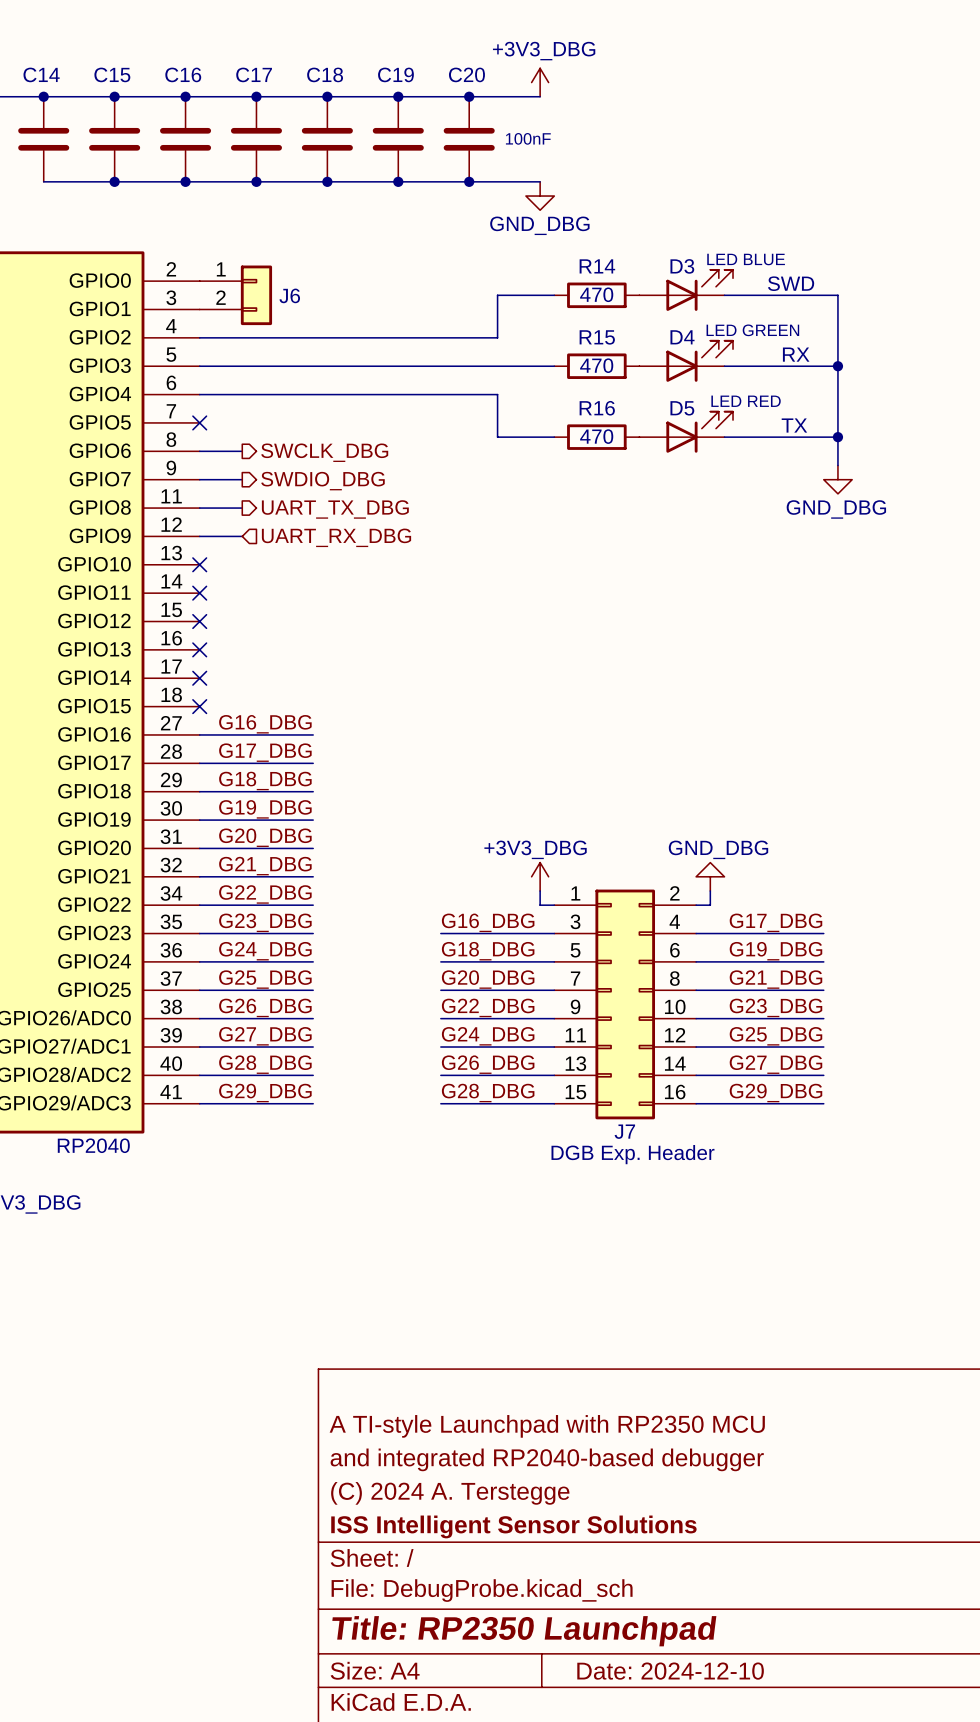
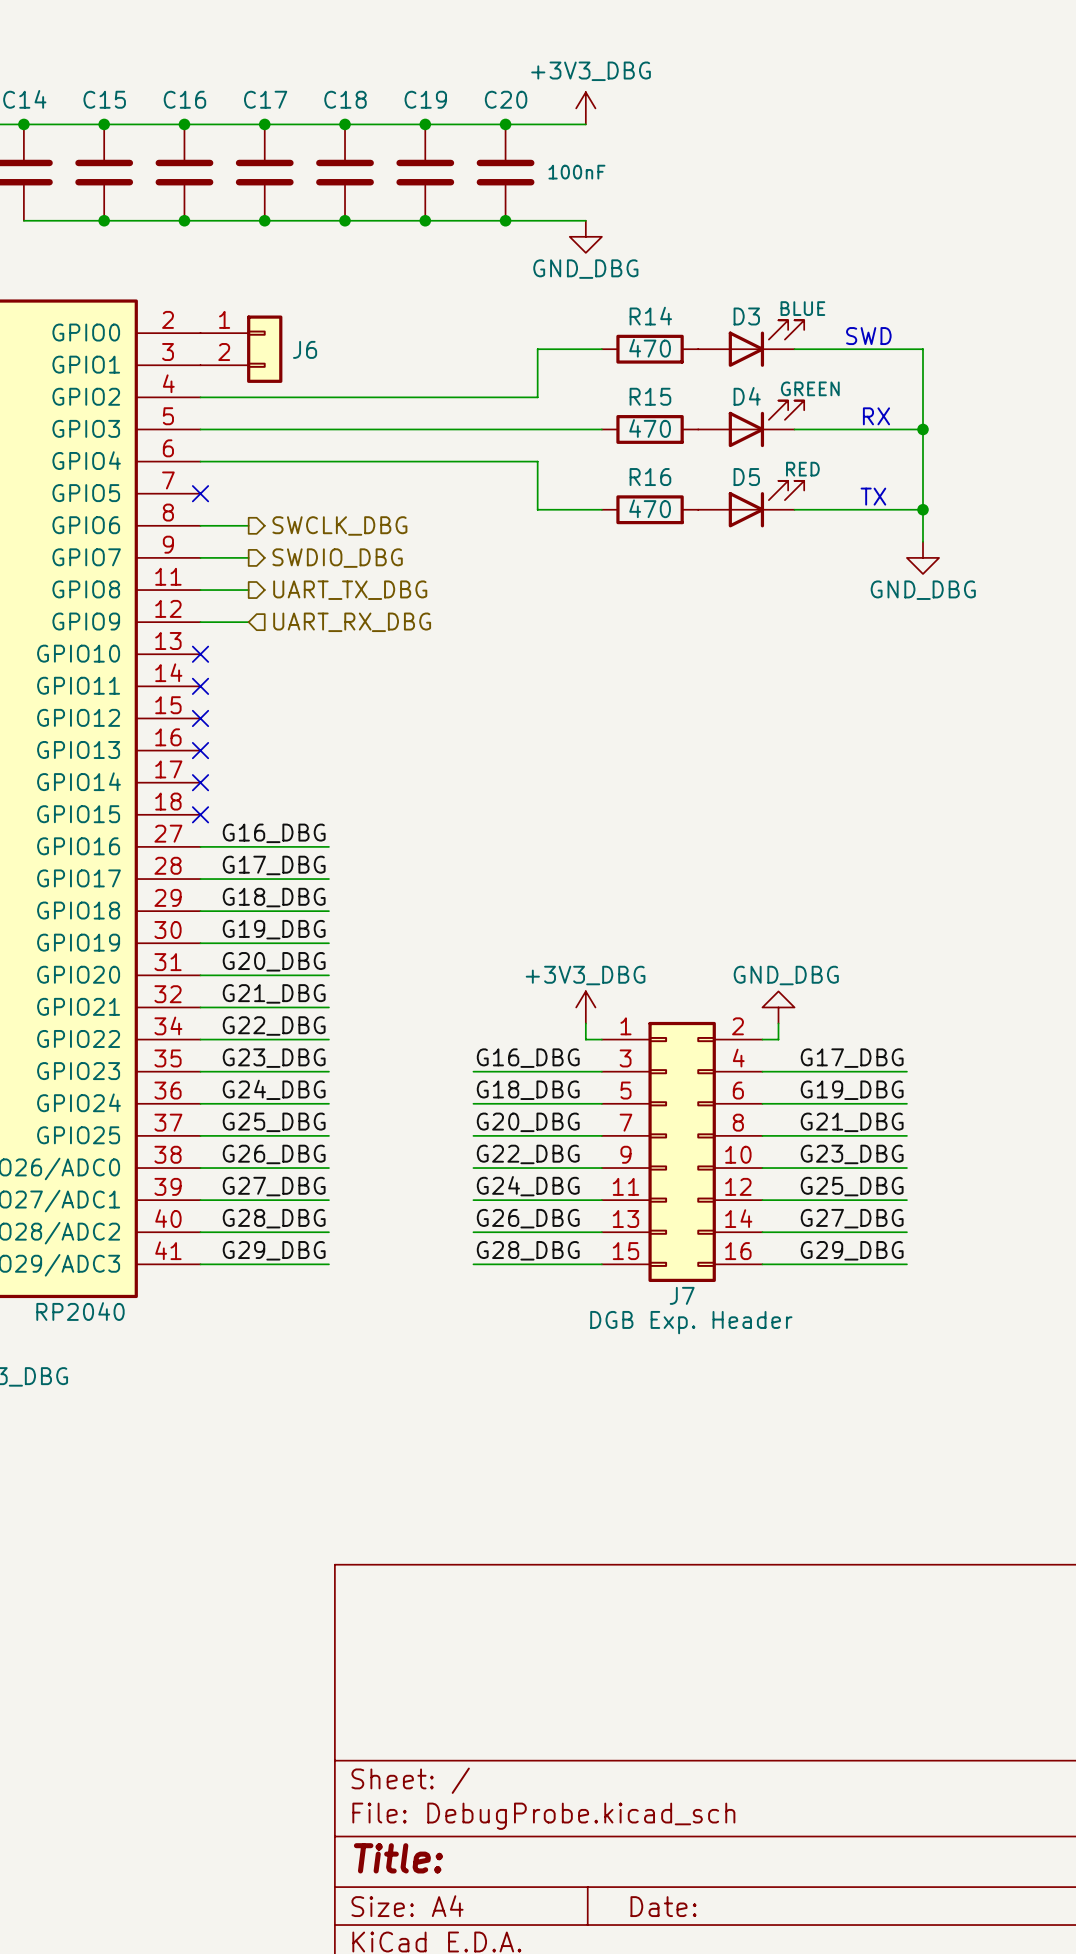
D3 value: LED BLUE (746, 259) -> BLUE (802, 308)
D4 value: LED GREEN (752, 330) -> GREEN (810, 388)
D5 value: LED RED (746, 401) -> RED (802, 469)
title block: A TI-style Launchpad with RP2350 MCU (547, 1426) -> none
title block: and integrated RP2040-based debugger (547, 1459) -> none
title block: (C) 2024 A. Terstegge (450, 1493) -> none
title block: ISS Intelligent Sensor Solutions (513, 1526) -> none
title block: Title: RP2350 Launchpad (524, 1631) -> Title: (398, 1858)
title block: Date: 2024-12-10 (670, 1671) -> Date: (663, 1906)

